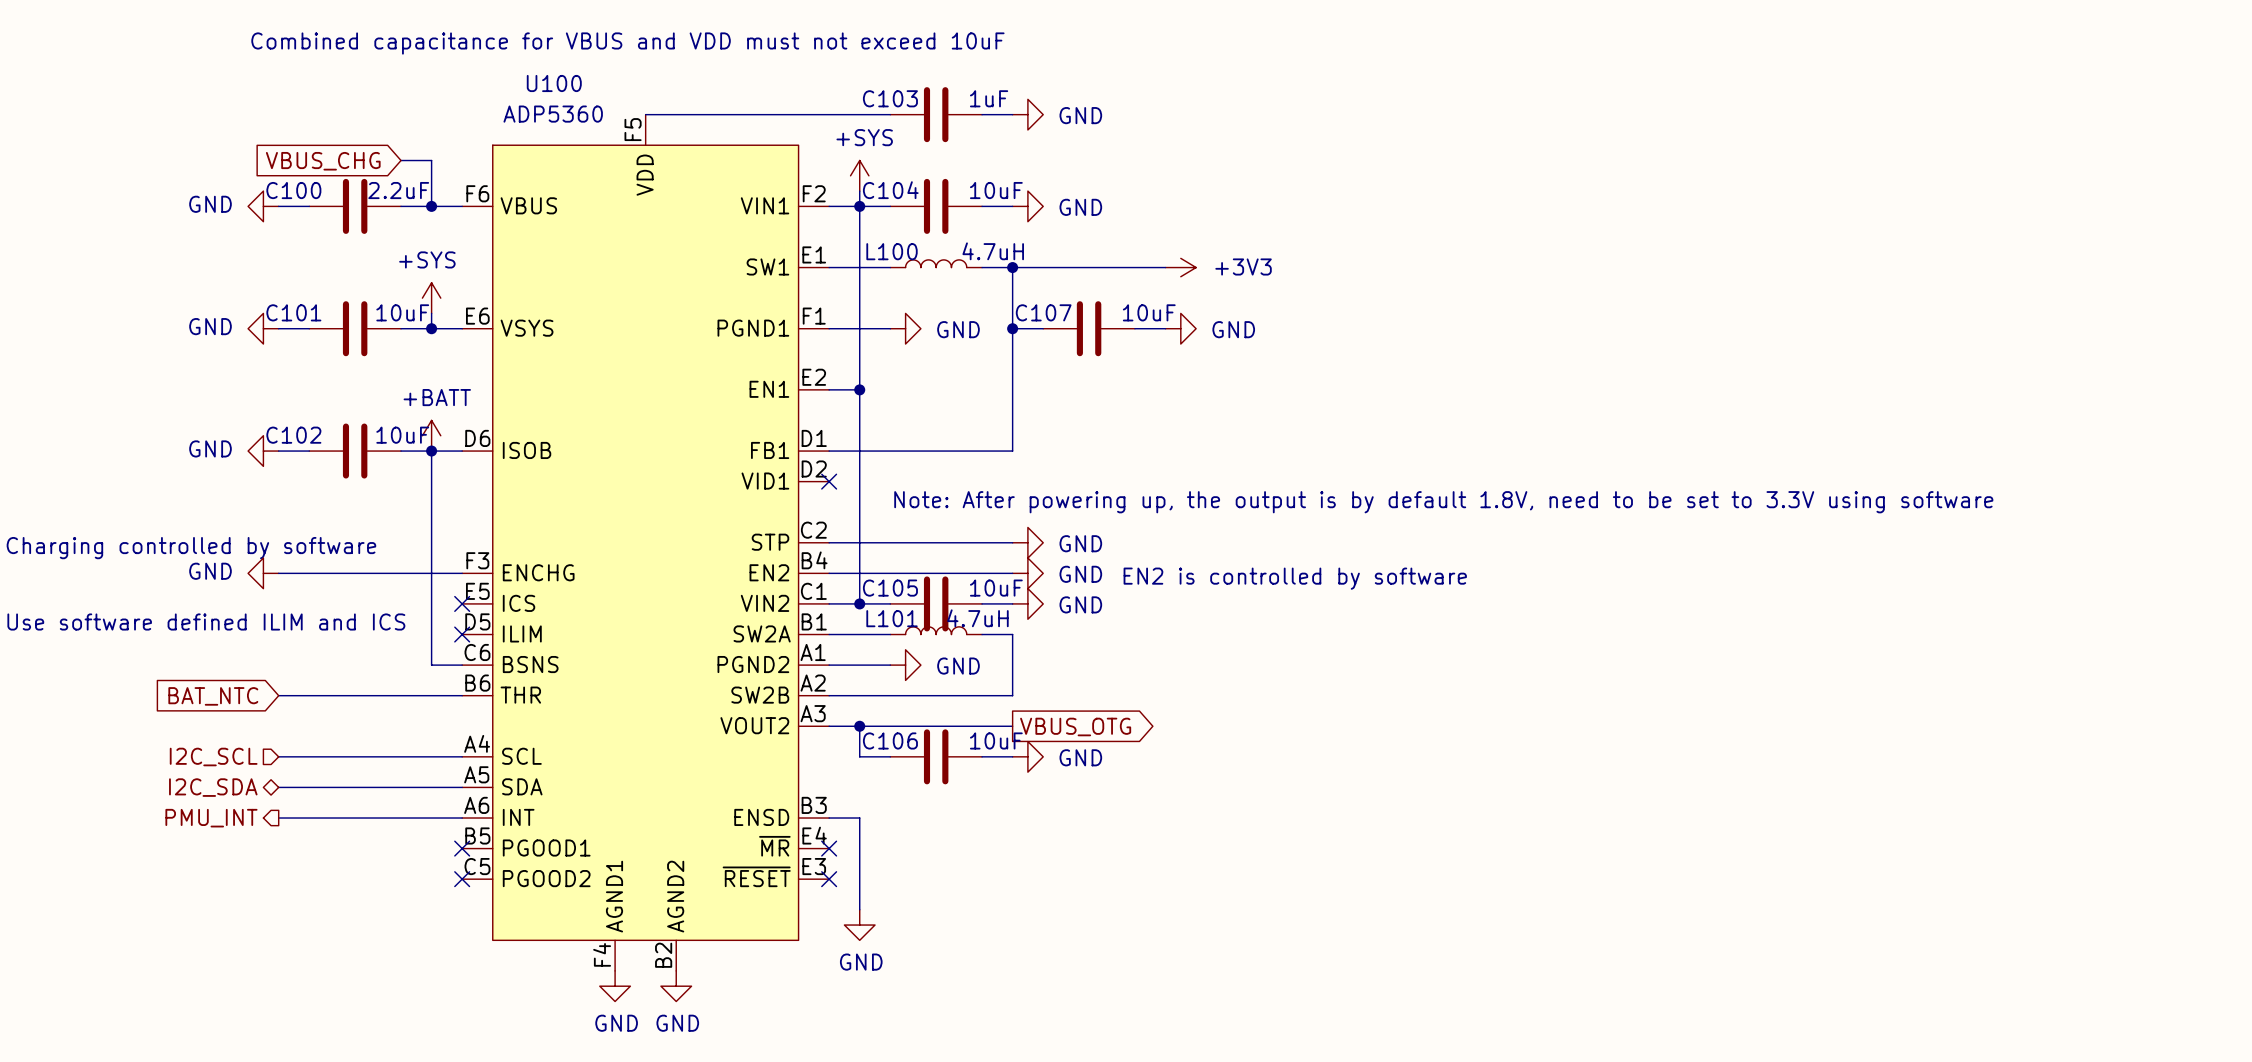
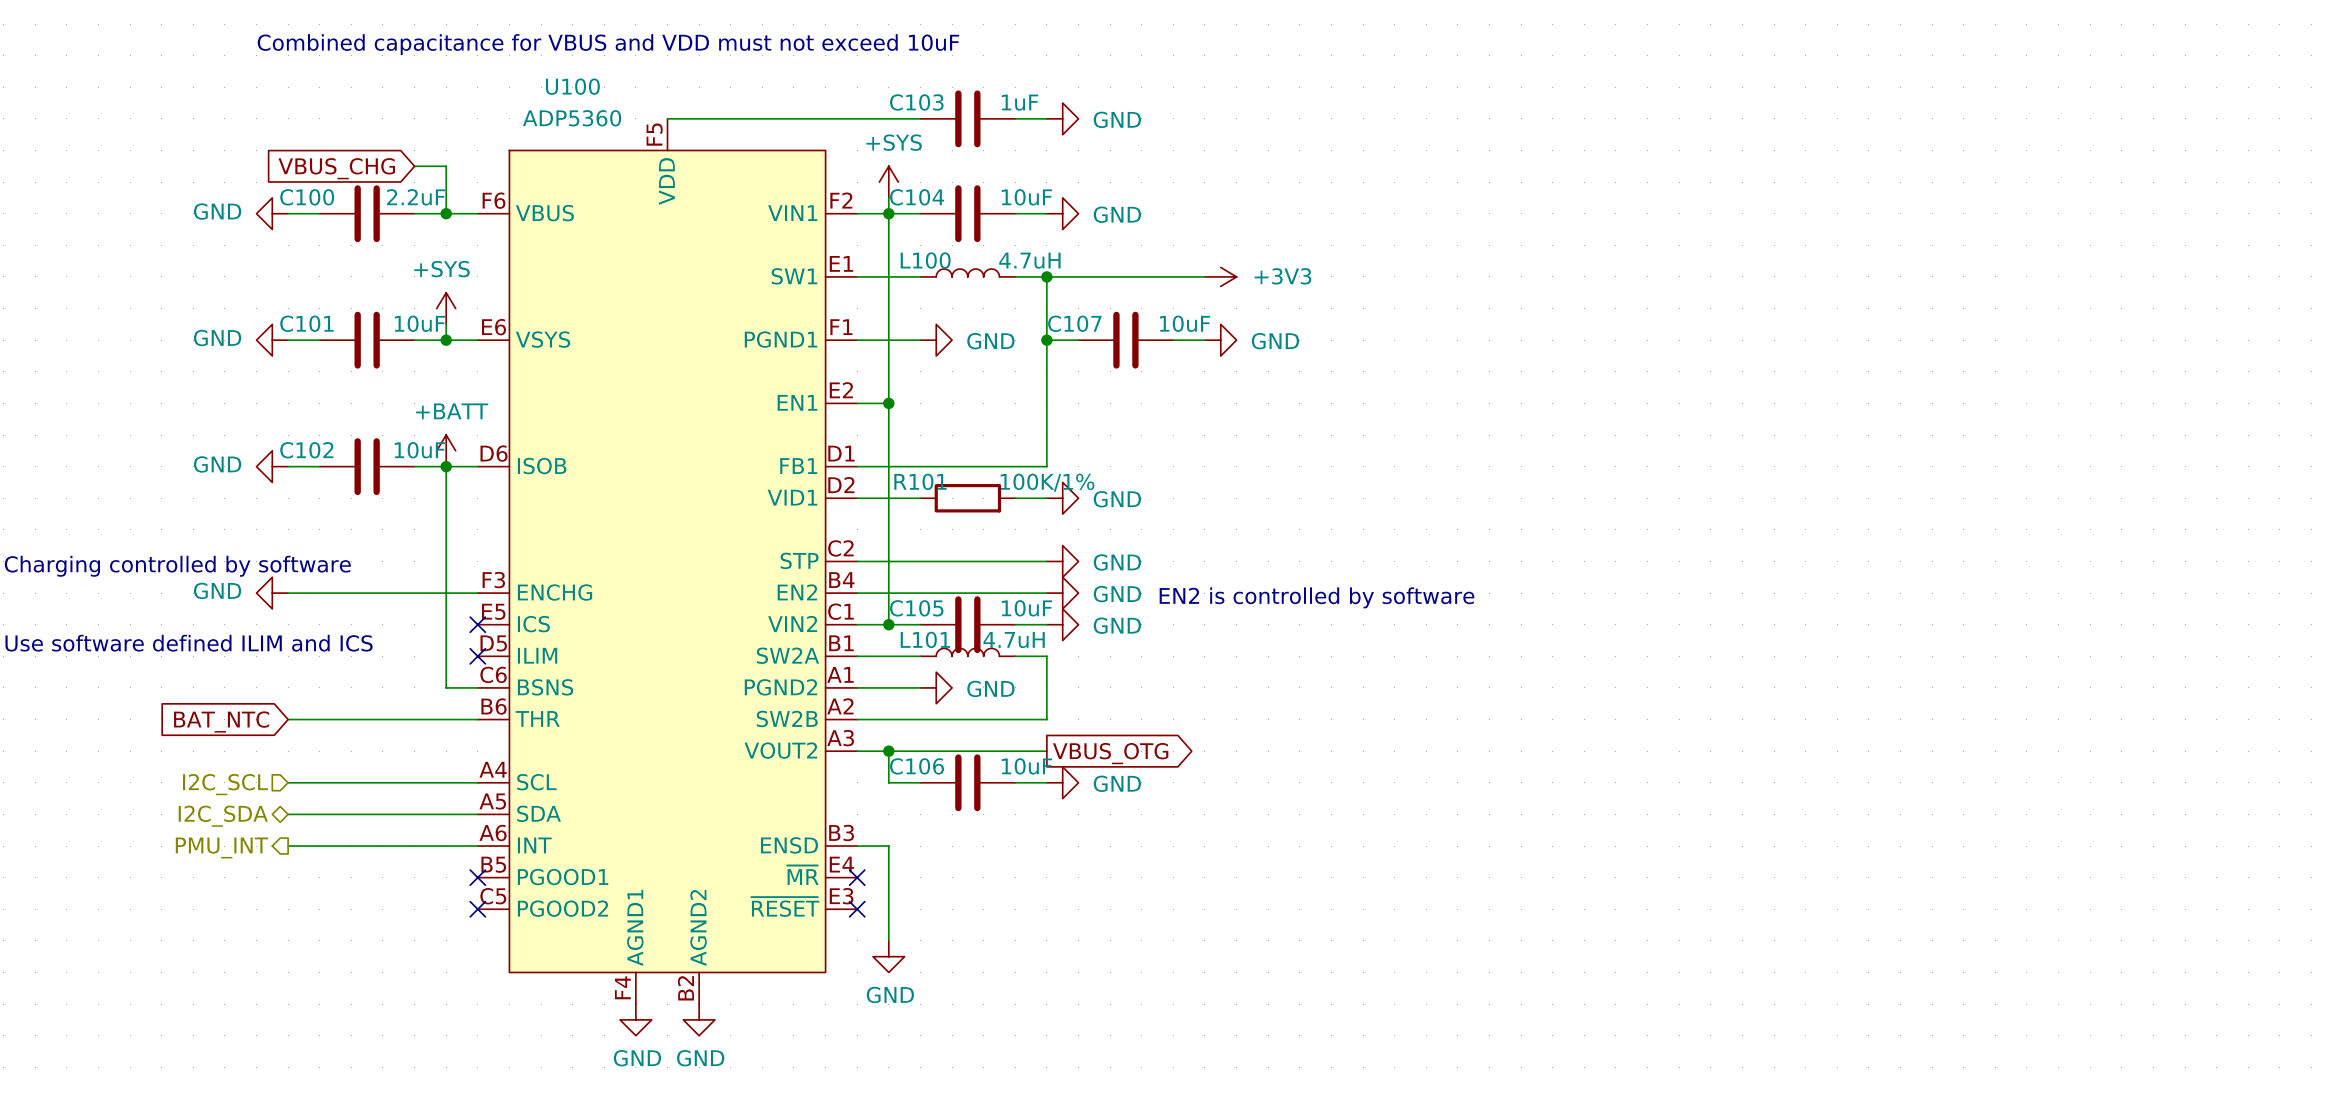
wire: none -> (857, 498) (920, 498)
no-connect mark: (829, 481) -> none
R101: none -> 100K/1% (967, 498)
wire: none -> (1015, 498) (1046, 498)
power symbol: none -> GND (1062, 498)
text: Note: After powering up, the output is by default 1.8V, need to be set to 3.3V using software (1443, 502) -> none

